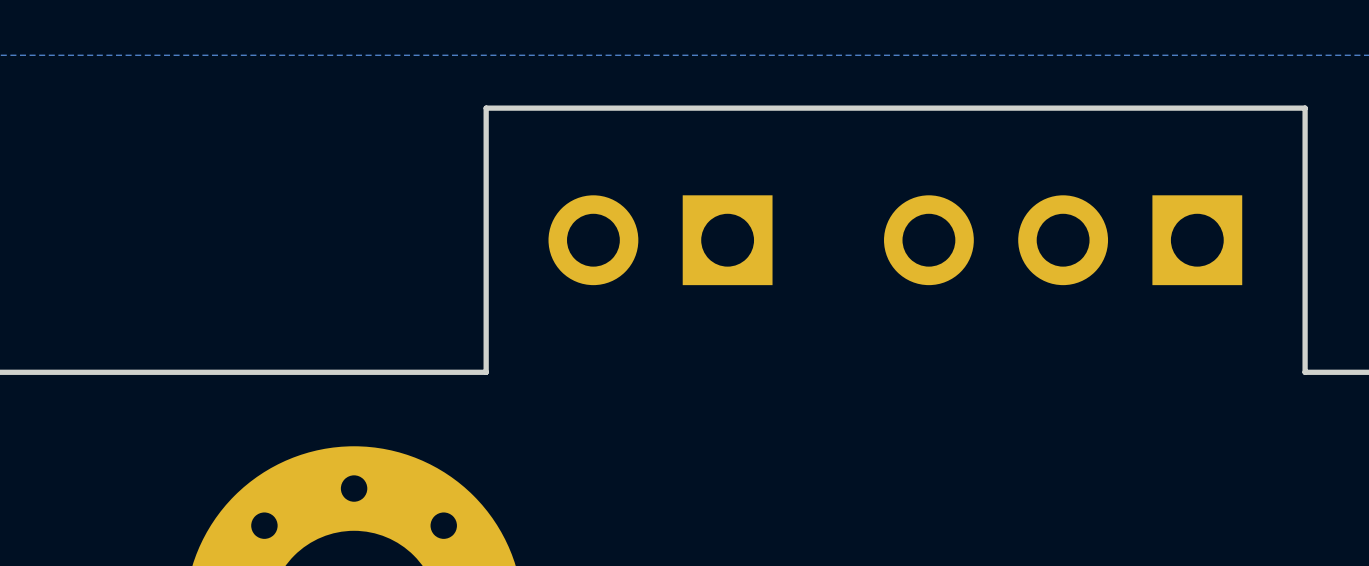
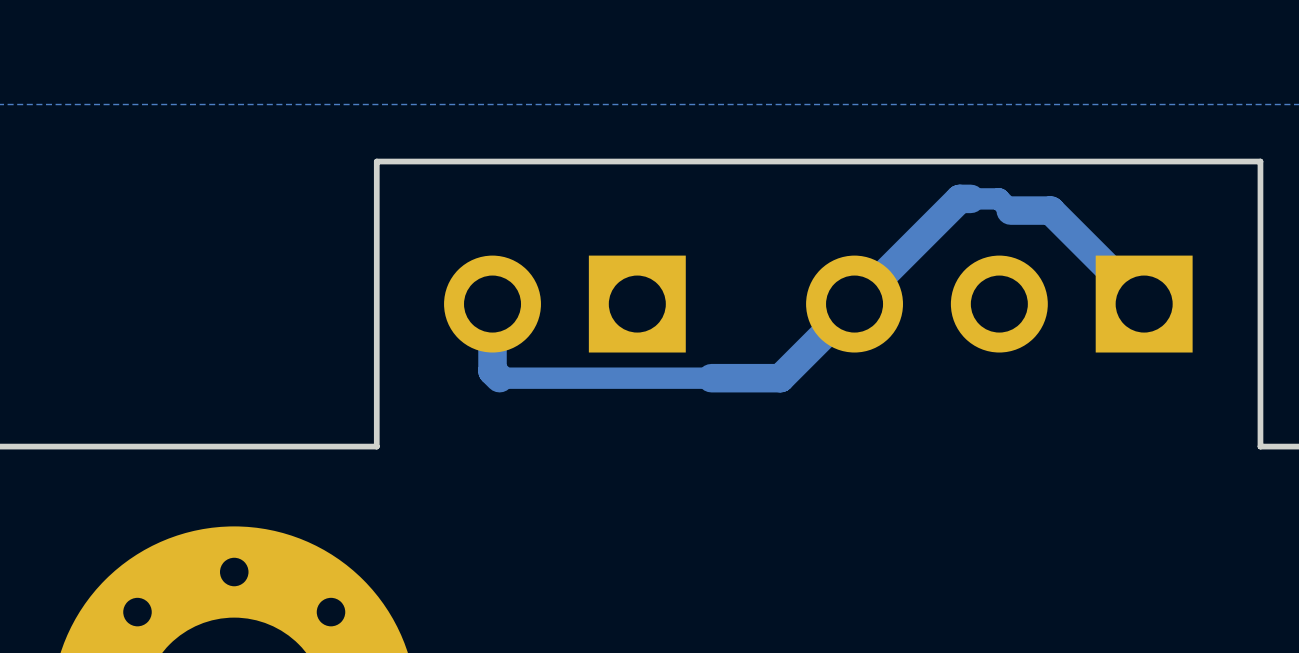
track: none -> (1144, 304) (1050, 210) (1010, 210) (999, 198) (959, 198) (780, 378) (499, 378) (492, 371) (492, 304)

